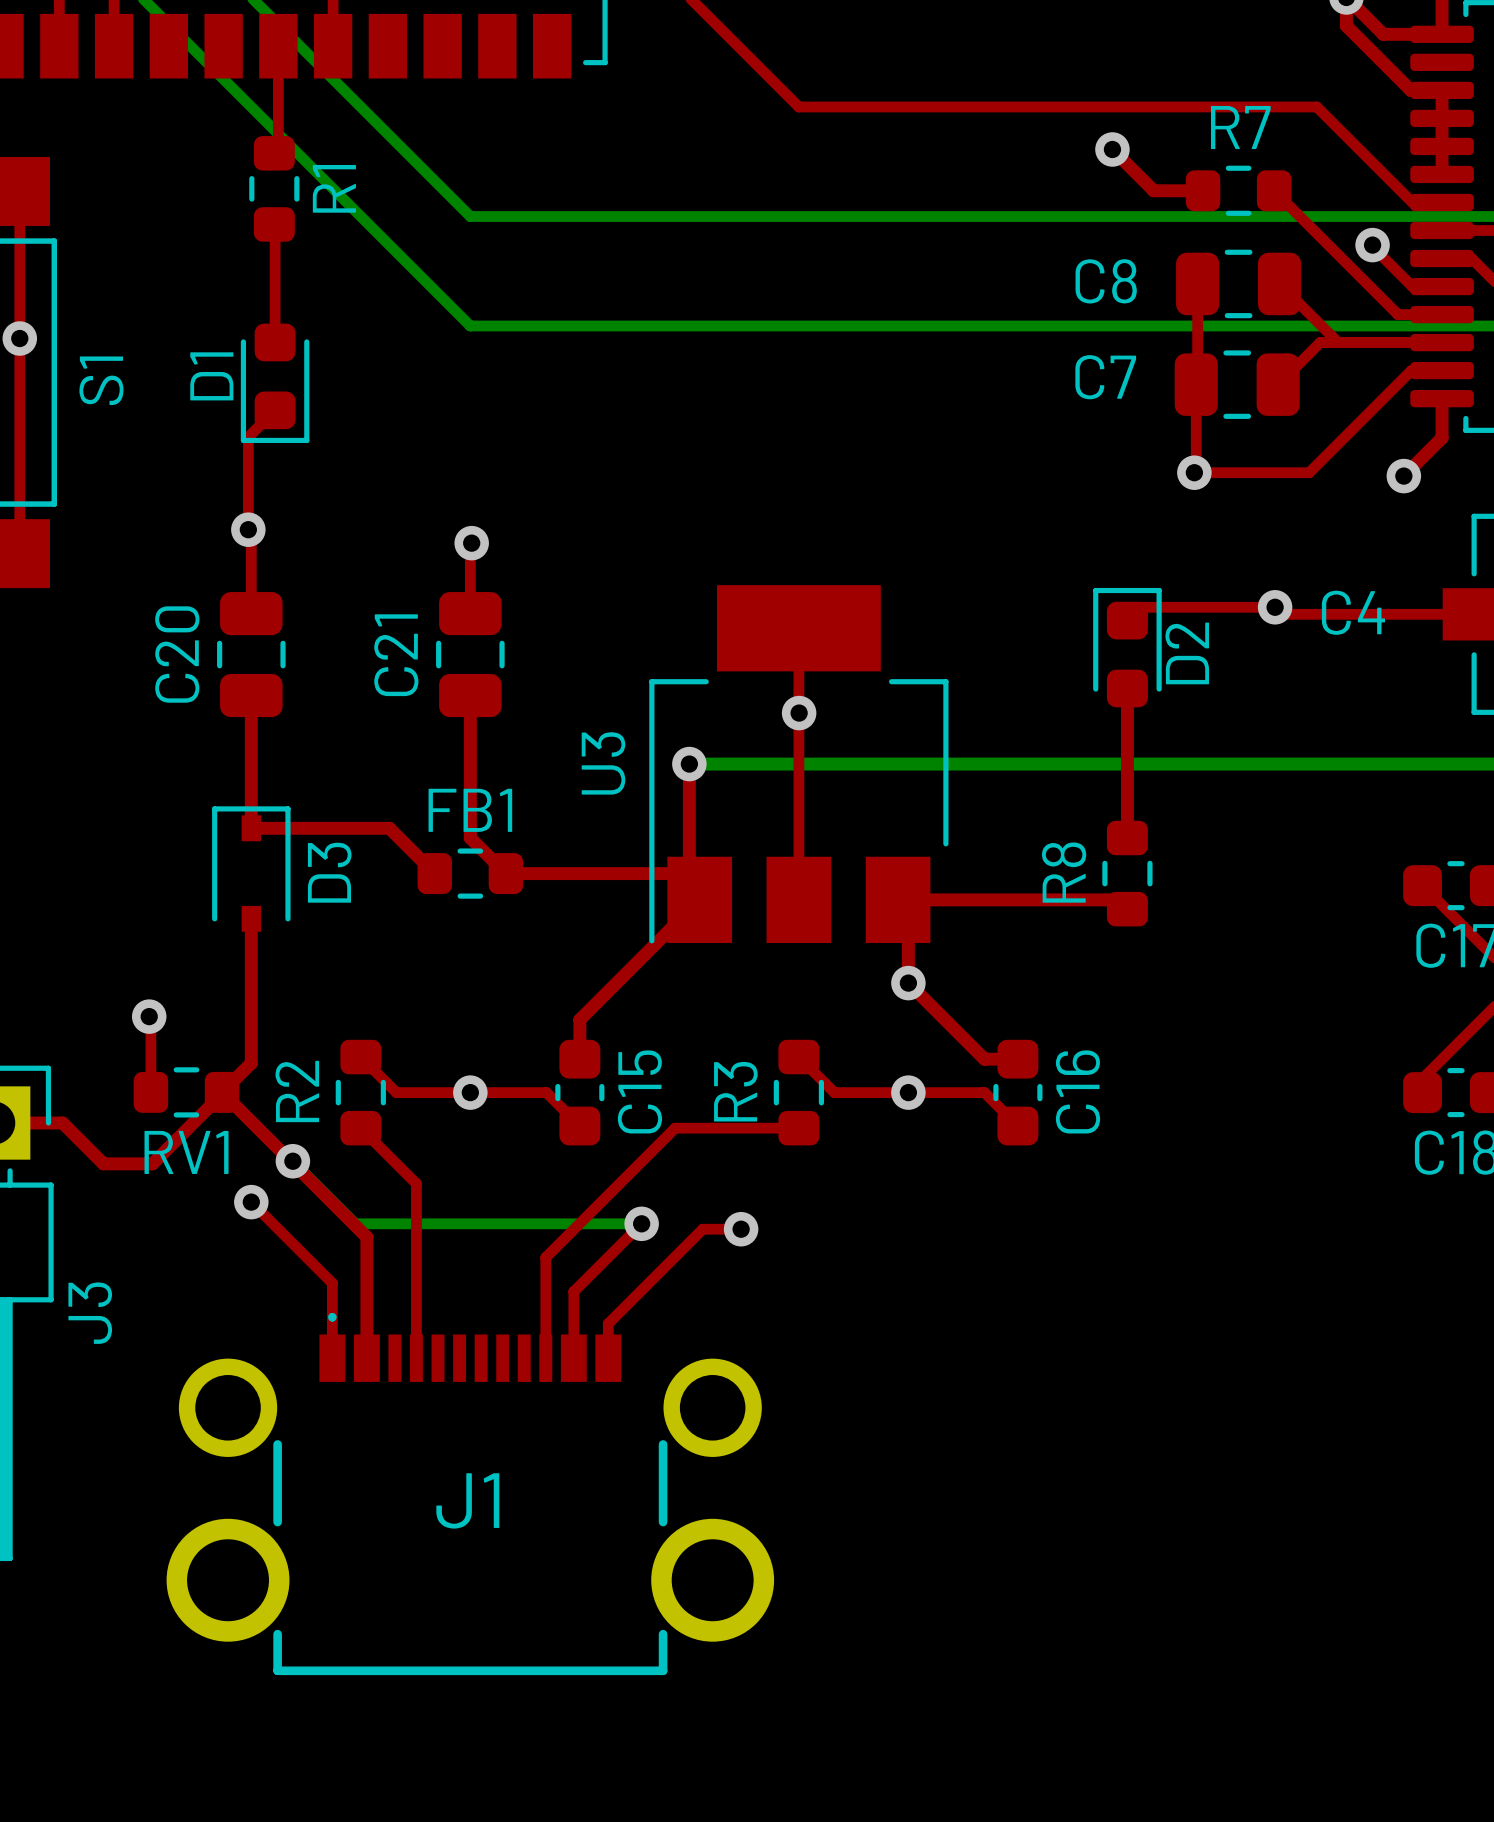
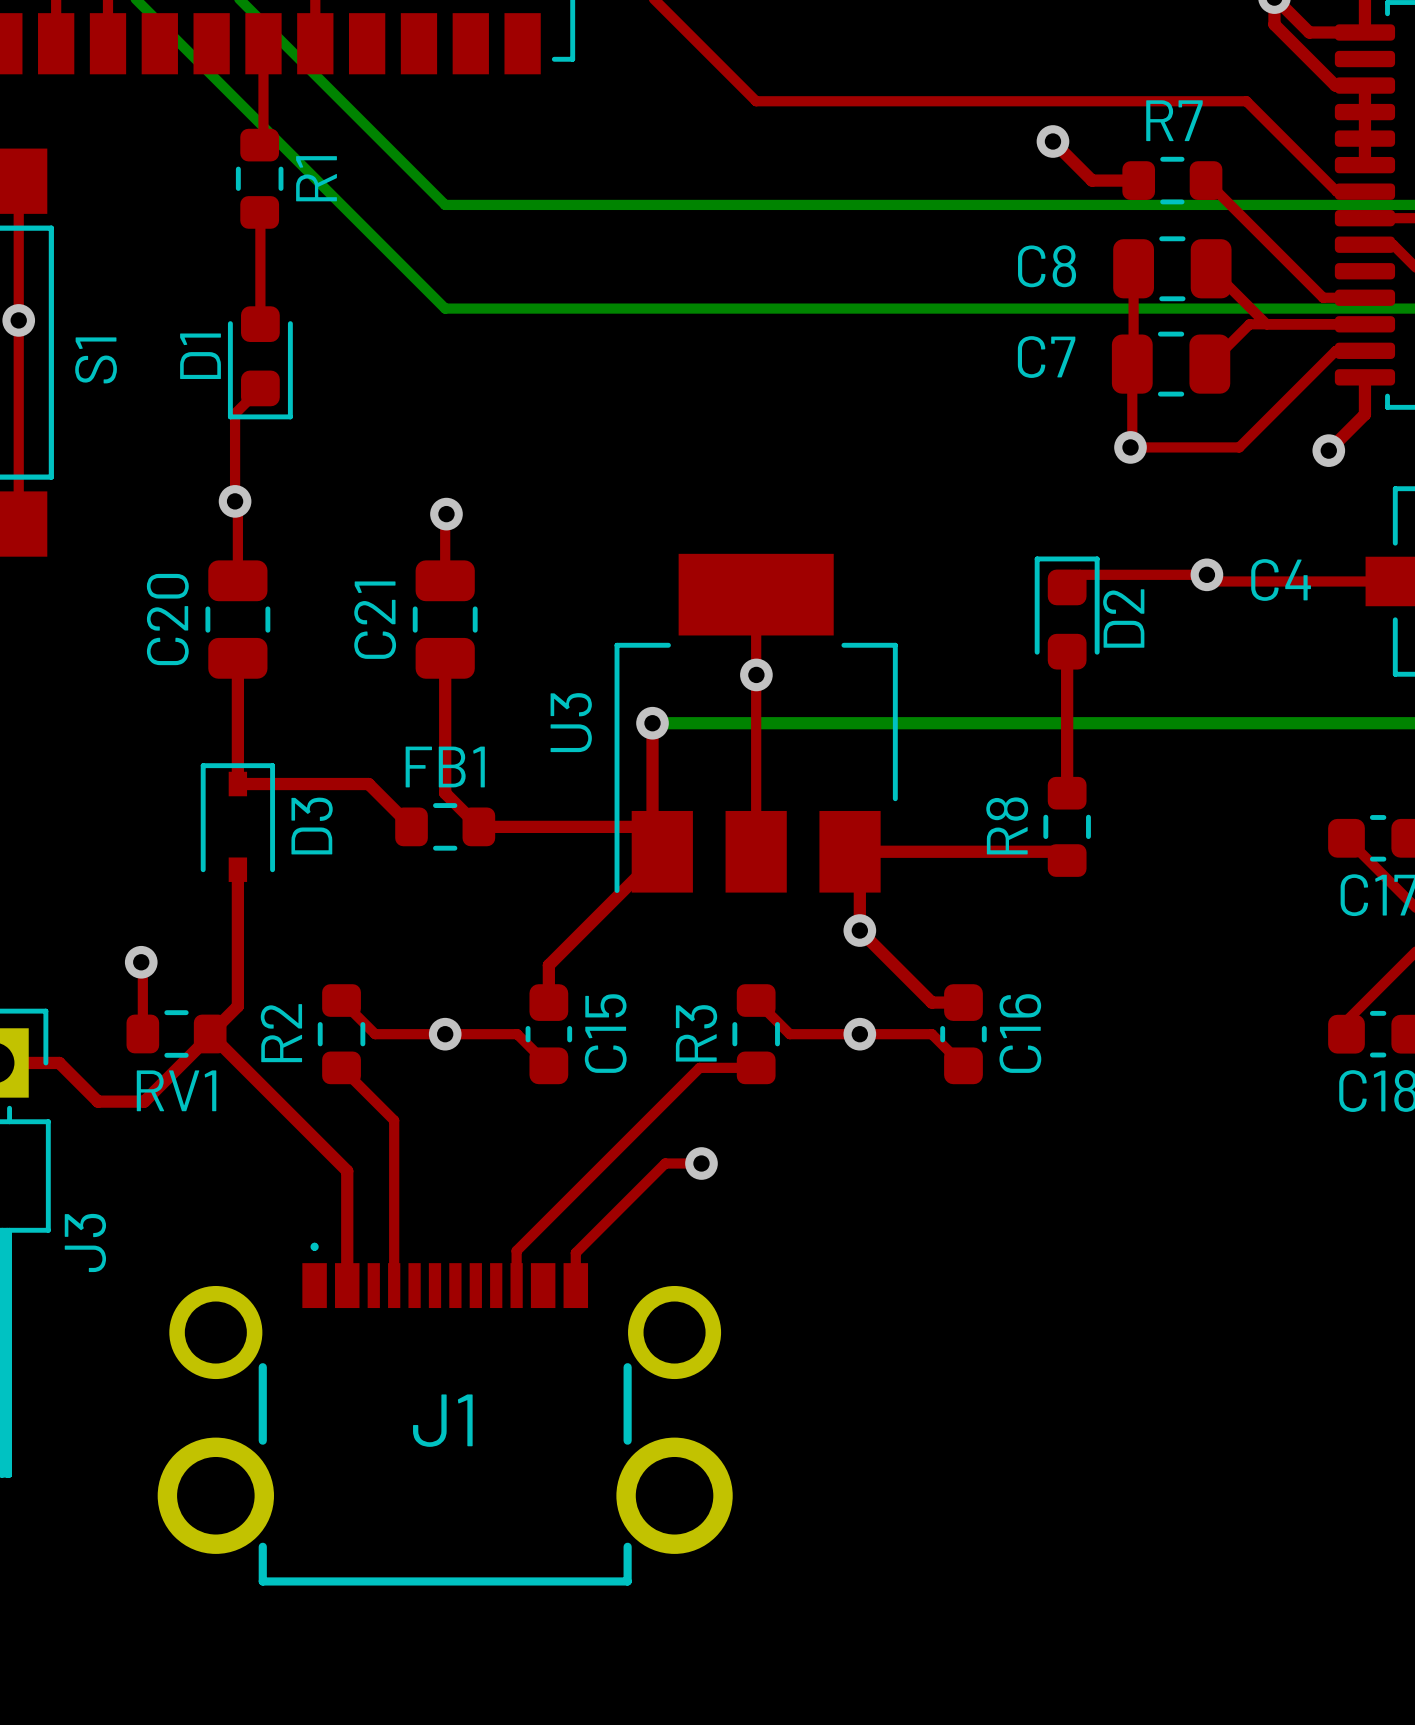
top track: (1372, 245) (1412, 286) (1442, 286) -> none
via: (1372, 245) -> none
top track: (739, 1128) (675, 1128) (545, 1257) (545, 1321) -> (699, 1067) (516, 1250)
bottom track: (292, 1161) (355, 1223) (641, 1223) -> none
via: (292, 1161) -> none
top track: (251, 1202) (332, 1283) (332, 1358) -> none
via: (251, 1202) -> none
top track: (641, 1223) (573, 1291) (573, 1358) -> none
via: (641, 1223) -> none

